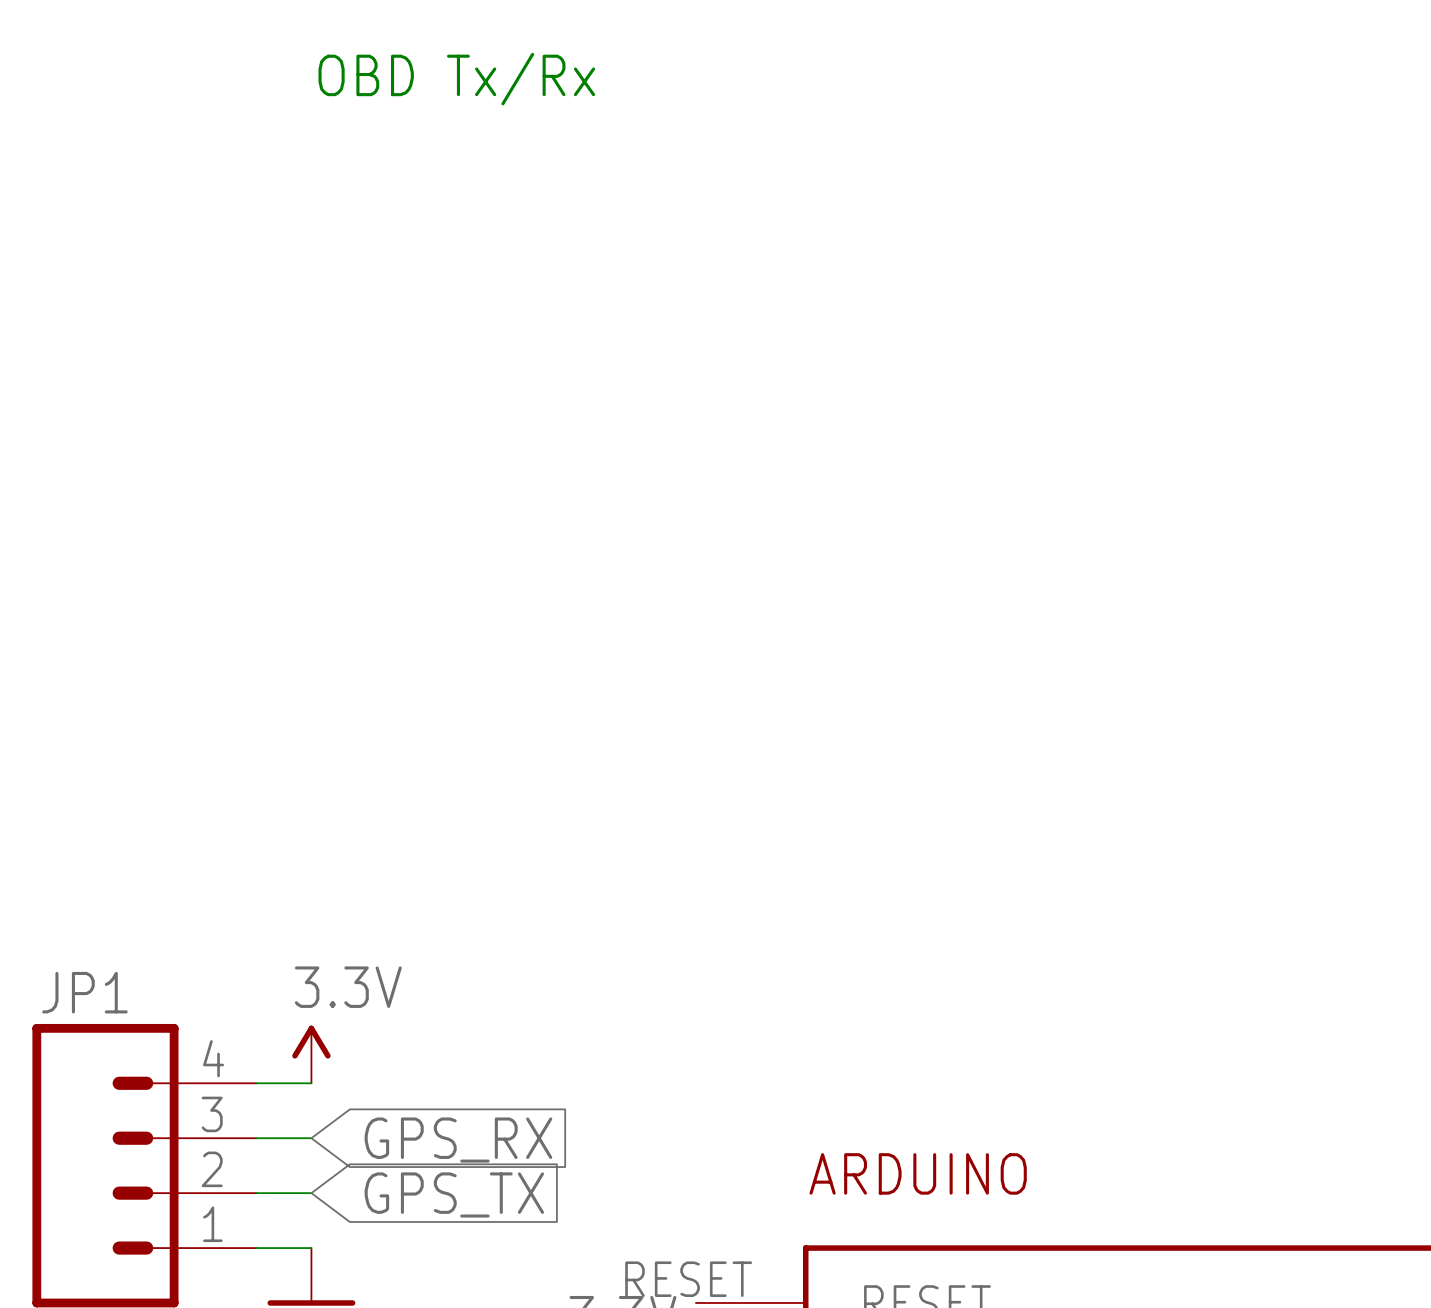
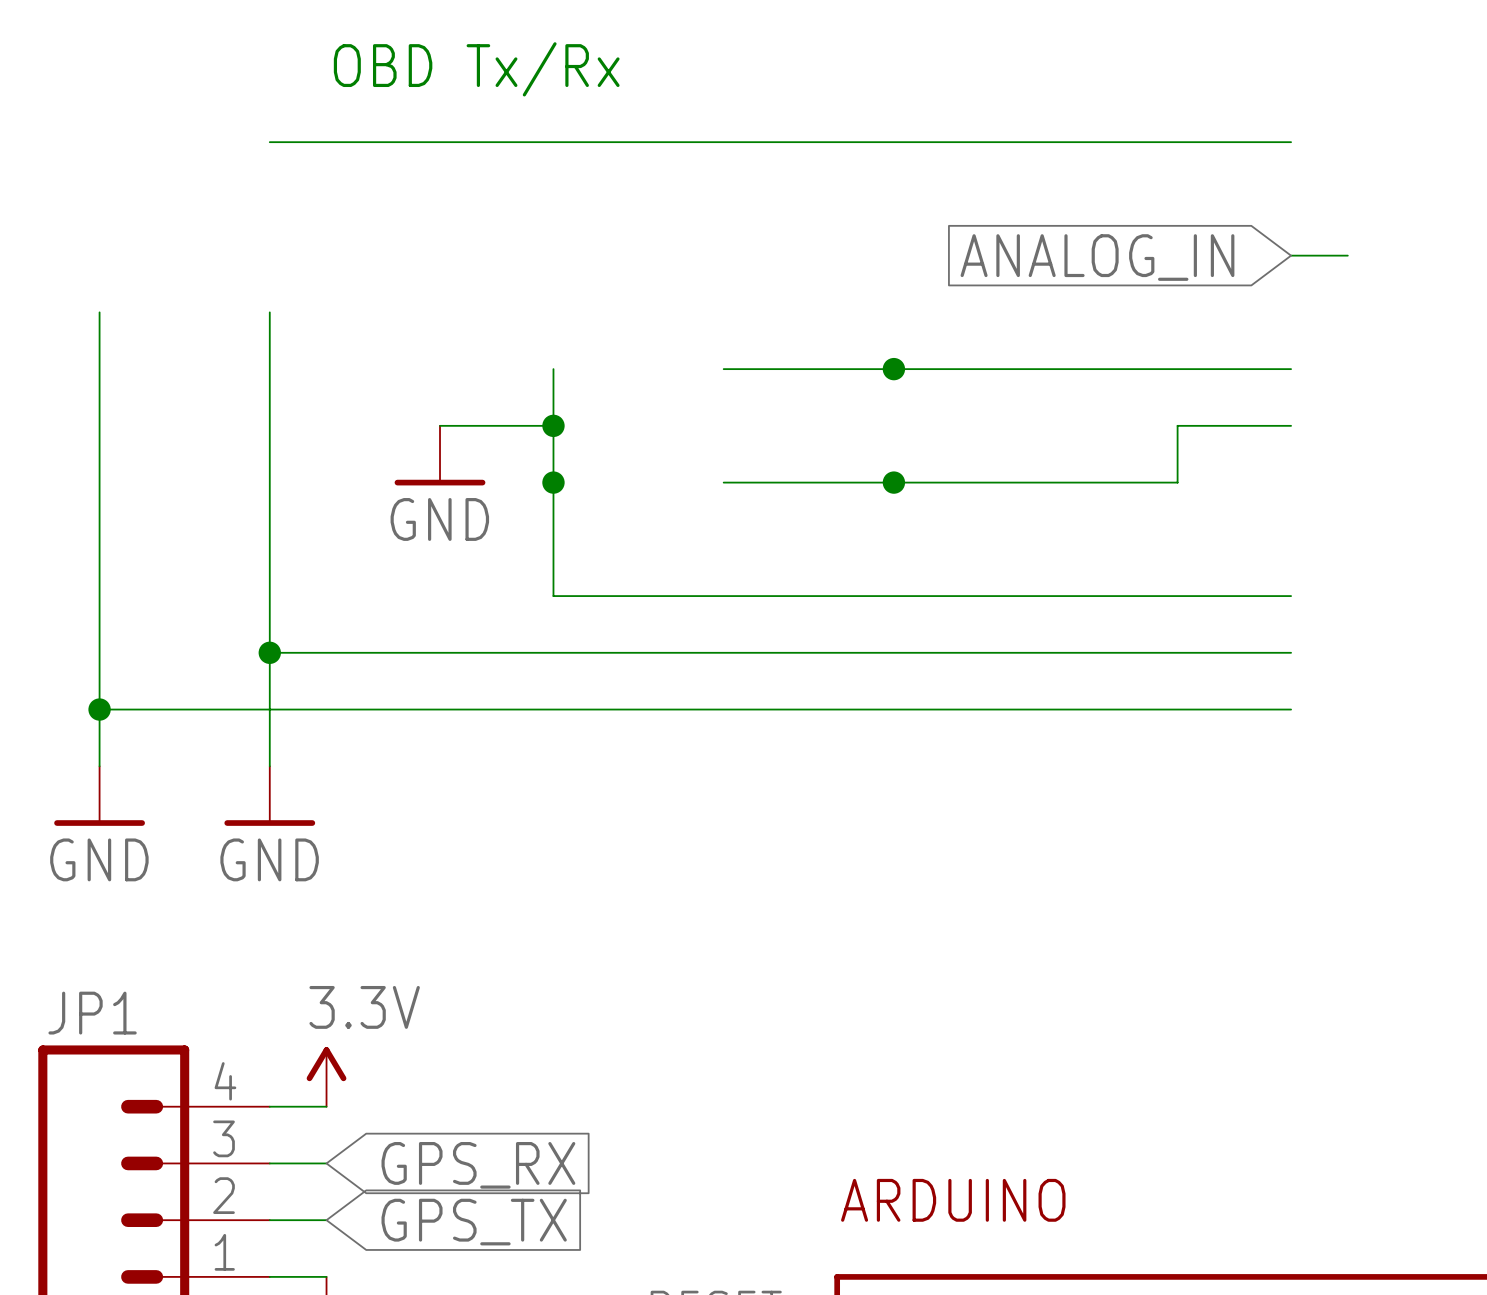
wire: none -> (269, 142) (1291, 142)
wire: none -> (1291, 255) (1347, 255)
global label: none -> ANALOG_IN (1097, 257)
wire: none -> (99, 312) (99, 766)
wire: none -> (269, 312) (269, 766)
wire: none -> (553, 369) (553, 596) (1291, 596)
wire: none -> (723, 369) (1291, 369)
junction: none -> (893, 369)
wire: none -> (440, 425) (553, 425)
junction: none -> (553, 425)
wire: none -> (1291, 425) (1177, 425) (1177, 482) (723, 482)
power symbol: none -> GND (440, 455)
junction: none -> (553, 482)
junction: none -> (893, 482)
wire: none -> (269, 652) (1291, 652)
junction: none -> (269, 652)
wire: none -> (99, 709) (1291, 709)
junction: none -> (99, 709)
power symbol: none -> GND (99, 796)
power symbol: none -> GND (269, 796)

